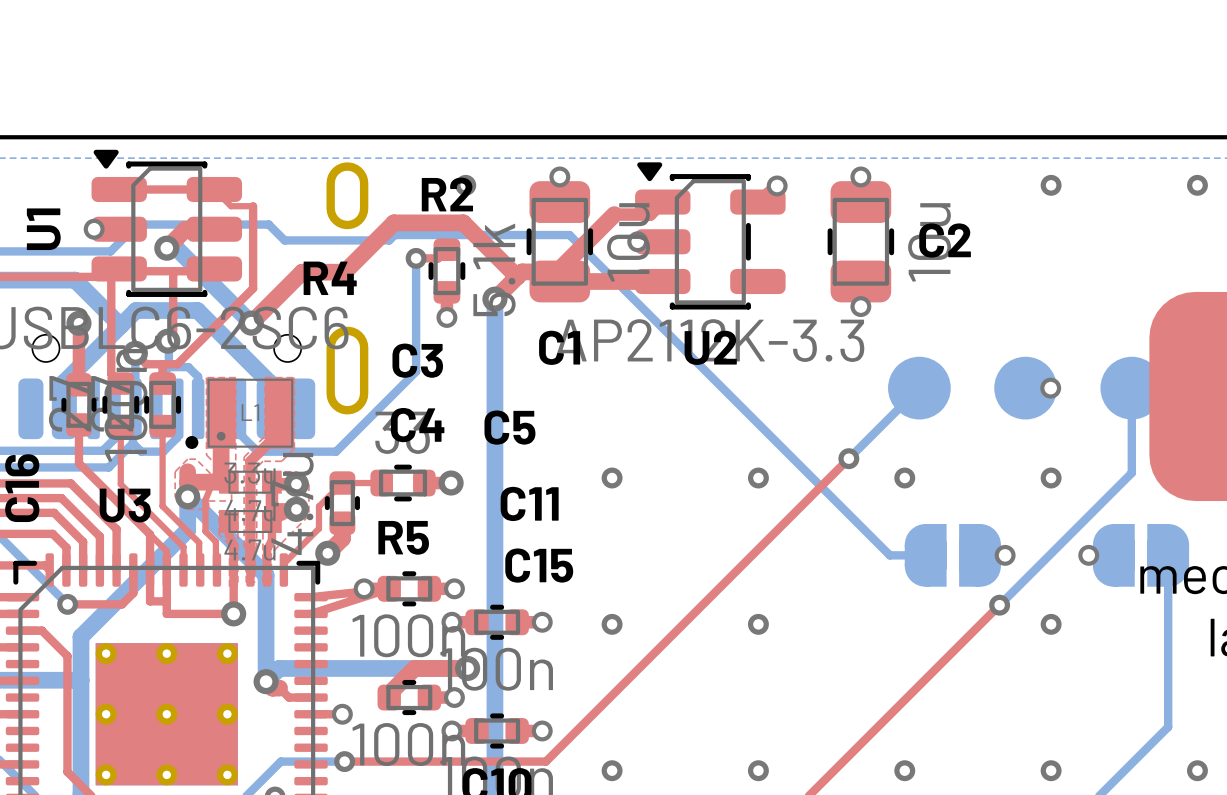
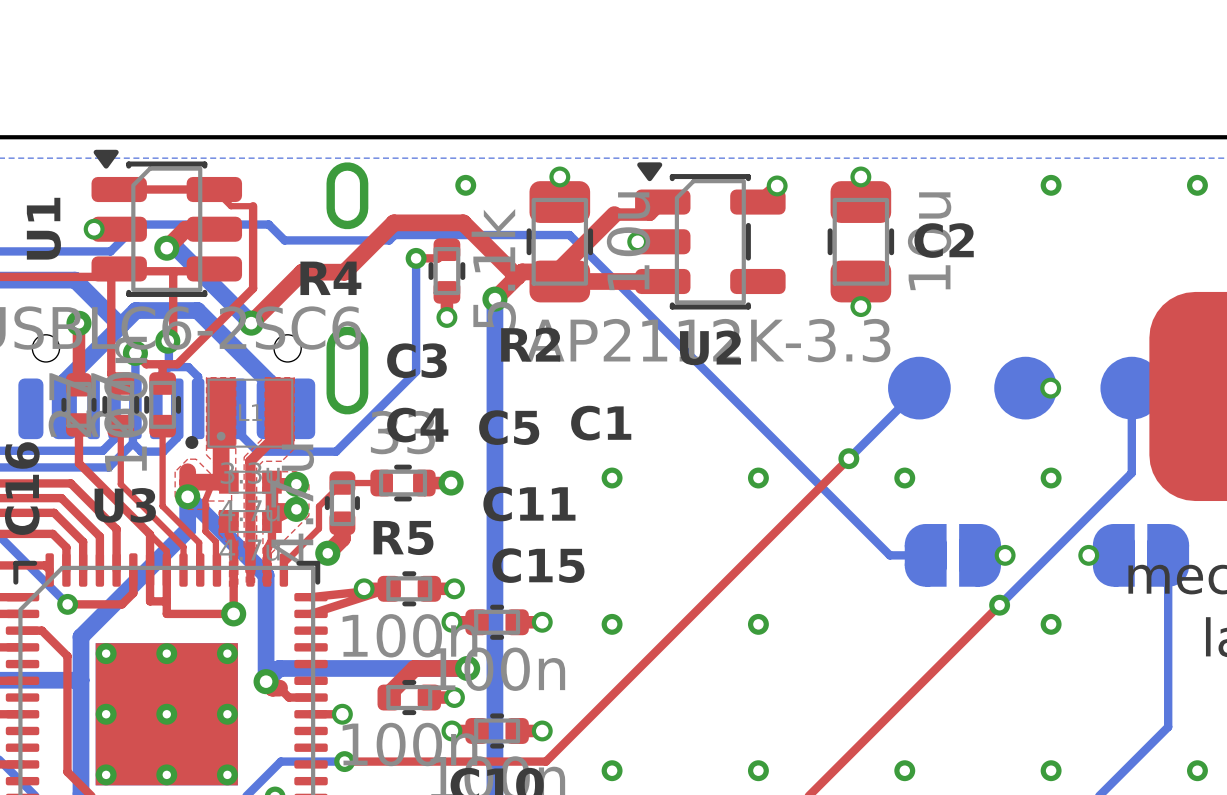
R2 name position: R2 (447, 194) -> R2 (530, 344)
C1 name position: C1 (559, 347) -> C1 (601, 423)

